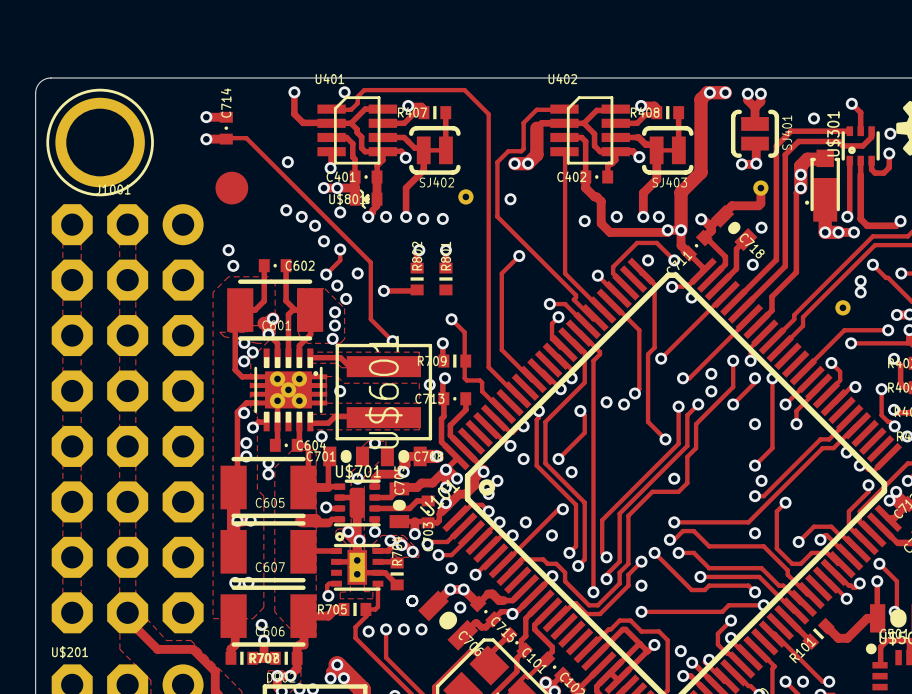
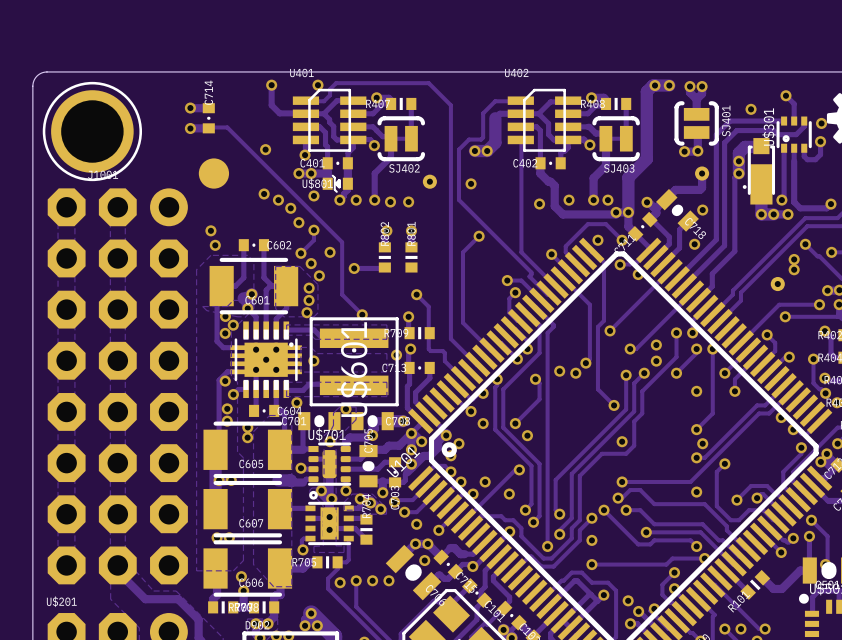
via: (412, 600) -> none

